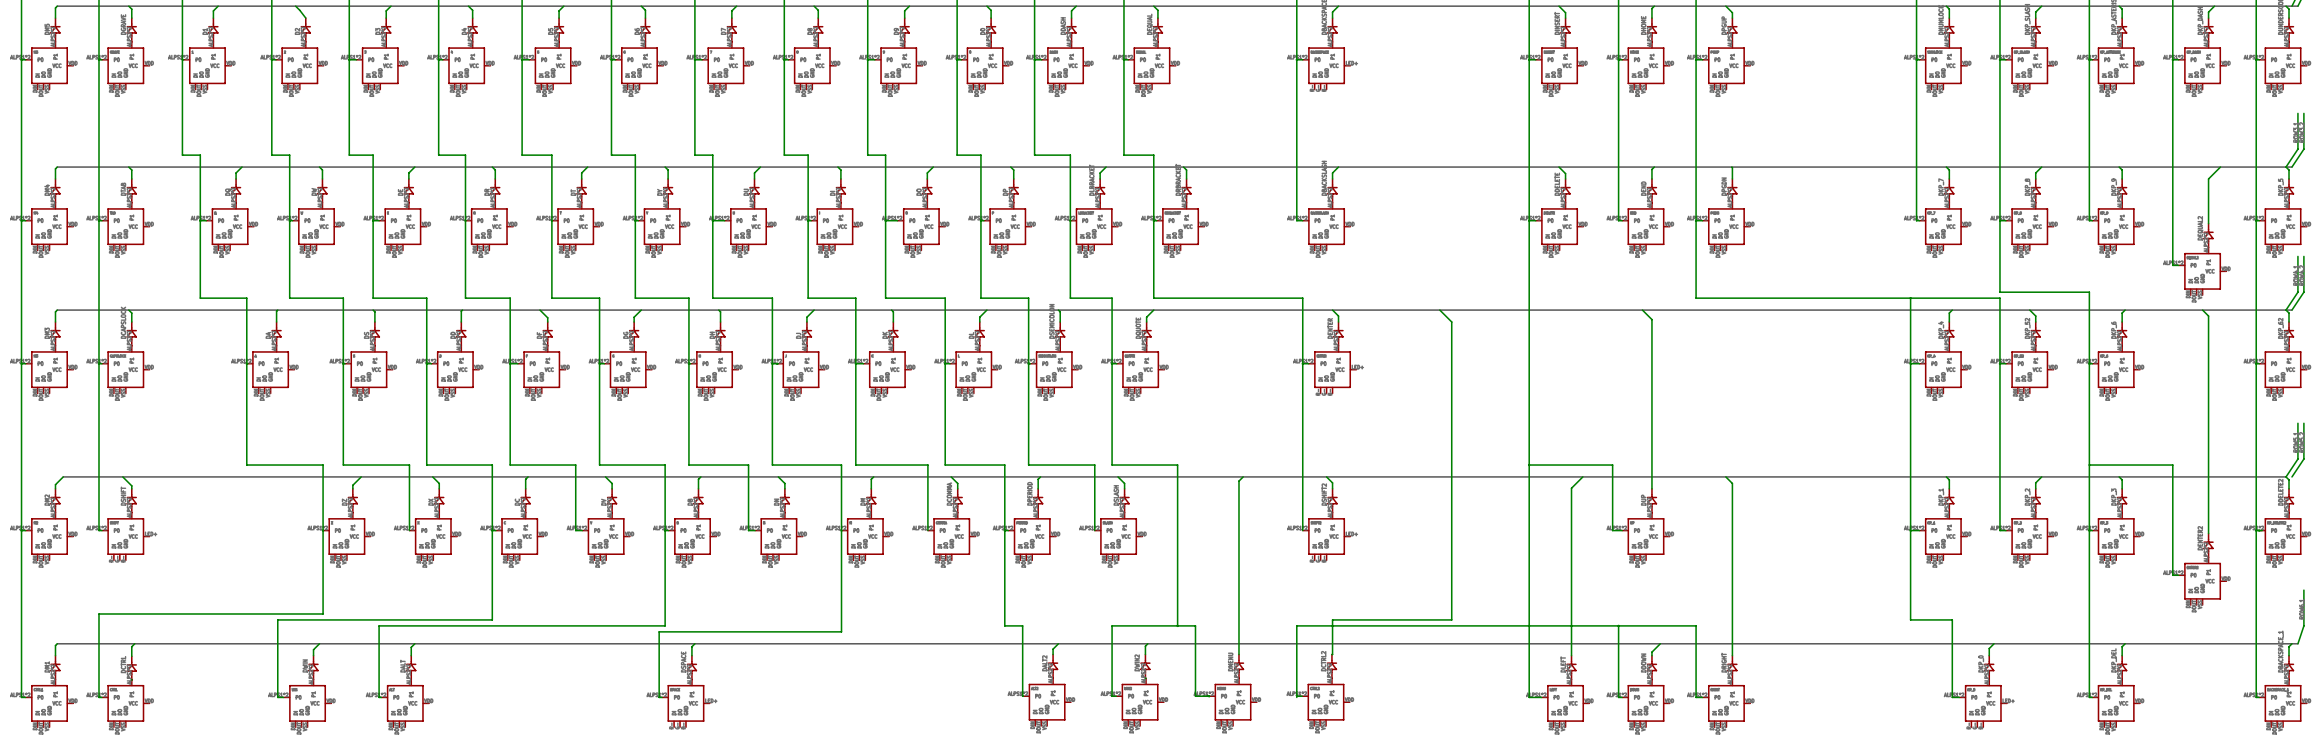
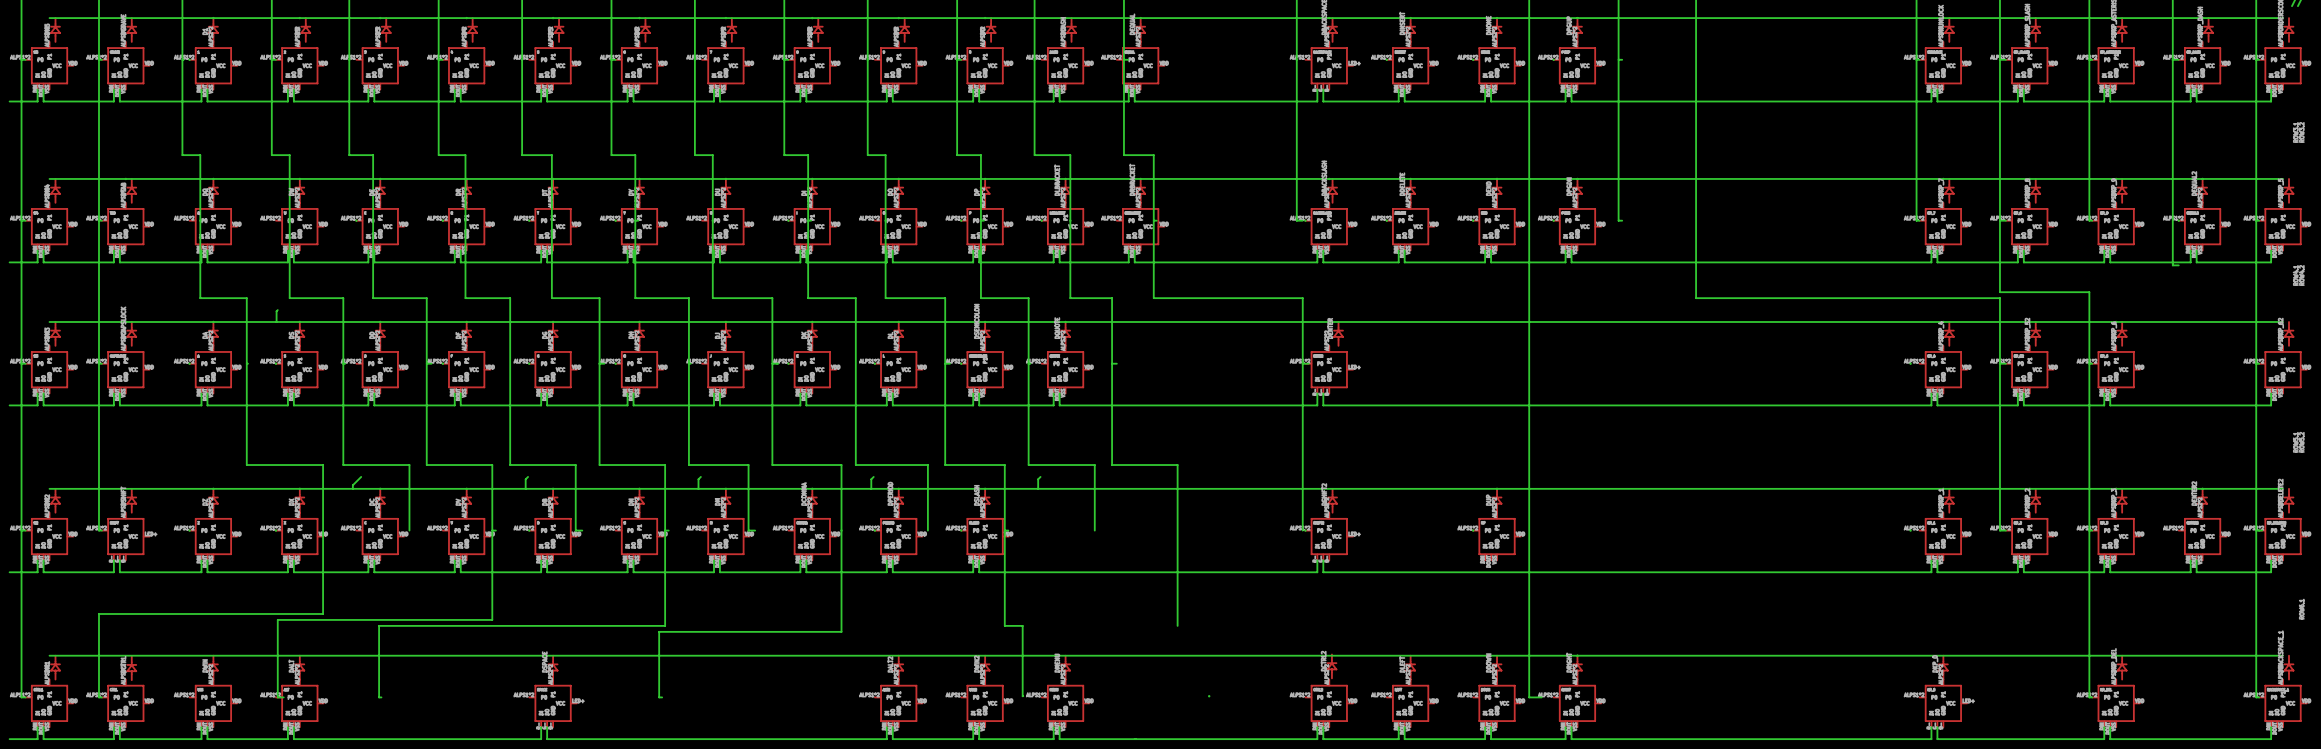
bus: (57, 6) (2297, 6) -> none
wire: (57, 6) (55, 7) (55, 18) -> none
wire: (128, 6) (131, 9) (131, 18) -> none
wire: (218, 6) (213, 10) (213, 18) -> none
wire: (295, 6) (305, 18) -> none
wire: (390, 6) (386, 10) (386, 18) -> none
wire: (468, 6) (472, 10) (472, 18) -> none
wire: (563, 6) (559, 10) (559, 18) -> none
wire: (641, 6) (645, 10) (645, 18) -> none
wire: (736, 6) (731, 10) (731, 18) -> none
wire: (814, 6) (818, 10) (818, 18) -> none
wire: (909, 6) (904, 10) (904, 18) -> none
wire: (986, 6) (991, 10) (991, 18) -> none
wire: (1076, 6) (1071, 10) (1071, 18) -> none
wire: (1153, 6) (1157, 10) (1157, 18) -> none
wire: (1338, 6) (1332, 12) (1332, 18) -> none
wire: (1559, 6) (1565, 12) (1565, 18) -> none
wire: (1654, 6) (1651, 8) (1651, 18) -> none
wire: (1725, 6) (1732, 12) (1732, 18) -> none
wire: (1946, 6) (1949, 9) (1949, 18) -> none
wire: (2041, 6) (2035, 12) (2035, 18) -> none
wire: (2119, 6) (2122, 9) (2122, 18) -> none
wire: (2214, 6) (2208, 12) (2208, 18) -> none
wire: (2286, 6) (2289, 9) (2289, 18) -> none
wire: none -> (49, 18) (2283, 18)
part position: (1157, 29) -> (1140, 29)
part: none -> (1410, 29)
part: none -> (1497, 29)
part: (1565, 29) -> none
part: none -> (1577, 29)
part: (1651, 29) -> none
part: (1732, 29) -> none
part symbol: [25, 41, 74, 90] -> [25, 41, 74, 90]
part symbol: [101, 41, 150, 90] -> [101, 41, 150, 90]
part symbol: [183, 41, 232, 90] -> [189, 41, 238, 90]
part symbol: [275, 41, 324, 90] -> [275, 41, 324, 90]
part symbol: [356, 41, 405, 90] -> [356, 41, 405, 90]
part symbol: [442, 41, 491, 90] -> [442, 41, 491, 90]
part symbol: [529, 41, 577, 90] -> [529, 41, 577, 90]
part symbol: [615, 41, 664, 90] -> [615, 41, 664, 90]
part symbol: [702, 41, 750, 90] -> [702, 41, 750, 90]
part symbol: [788, 41, 837, 90] -> [788, 41, 837, 90]
part symbol: [874, 41, 923, 90] -> [874, 41, 923, 90]
part symbol: [961, 41, 1009, 90] -> [961, 41, 1009, 90]
part symbol: [1041, 41, 1090, 90] -> [1041, 41, 1090, 90]
part symbol: [1919, 41, 1968, 90] -> [1919, 41, 1968, 90]
part symbol: [2005, 41, 2054, 90] -> [2005, 41, 2054, 90]
part symbol: [2092, 41, 2141, 90] -> [2092, 41, 2141, 90]
part symbol: [2178, 41, 2227, 90] -> [2178, 41, 2227, 90]
part symbol: [2259, 41, 2307, 90] -> [2259, 41, 2307, 90]
junction: none -> (189, 59)
wire: (349, 59) (356, 59) -> none
wire: (522, 59) (529, 59) -> none
wire: (694, 59) (702, 59) -> none
wire: (867, 59) (874, 59) -> none
wire: (1034, 59) (1041, 59) -> none
wire: (1296, 59) (1302, 59) -> none
junction: none -> (1386, 59)
junction: none -> (1473, 59)
wire: (1529, 59) (1535, 59) -> none
junction: none -> (1553, 59)
wire: (1696, 59) (1702, 59) -> none
part: none -> (1140, 65)
part: (1151, 65) -> none
part: (1326, 65) -> none
part: none -> (1329, 65)
part: none -> (1410, 65)
part: none -> (1497, 65)
part: (1559, 65) -> none
part: none -> (1577, 65)
part: (1646, 65) -> none
part: (1726, 65) -> none
wire: none -> (37, 89) (37, 101) (9, 101)
wire: none -> (43, 89) (43, 101) (113, 101) (113, 89)
wire: none -> (119, 89) (119, 101) (201, 101) (201, 89)
wire: none -> (207, 89) (207, 101) (287, 101) (287, 89)
wire: none -> (293, 89) (293, 101) (368, 101) (368, 89)
wire: none -> (374, 89) (374, 101) (454, 101) (454, 89)
wire: none -> (460, 89) (460, 101) (541, 101) (541, 89)
wire: none -> (547, 89) (547, 101) (627, 101) (627, 89)
wire: none -> (633, 89) (633, 101) (713, 101) (713, 89)
wire: none -> (719, 89) (719, 101) (800, 101) (800, 89)
wire: none -> (806, 89) (806, 101) (886, 101) (886, 89)
wire: none -> (892, 89) (892, 101) (973, 101) (973, 89)
wire: none -> (979, 89) (979, 101) (1053, 101) (1053, 89)
wire: none -> (1059, 89) (1059, 101) (1128, 101) (1128, 89)
wire: none -> (1134, 89) (1134, 101) (1317, 101) (1317, 89)
wire: none -> (1323, 89) (1323, 101) (1398, 101) (1398, 89)
wire: none -> (1404, 89) (1404, 101) (1485, 101) (1485, 89)
wire: none -> (1491, 89) (1491, 101) (1565, 101) (1565, 89)
wire: none -> (1571, 89) (1571, 101) (1931, 101) (1931, 89)
wire: none -> (1937, 89) (1937, 101) (2017, 101) (2017, 89)
wire: none -> (2023, 89) (2023, 101) (2104, 101) (2104, 89)
wire: none -> (2110, 89) (2110, 101) (2190, 101) (2190, 89)
wire: none -> (2196, 89) (2196, 101) (2271, 101) (2271, 89)
wire: (2297, 113) (2297, 149) (2286, 167) (2289, 170) (2289, 178) -> none
wire: (2303, 113) (2303, 149) (2291, 167) -> none
bus: (57, 167) (2291, 167) -> none
wire: (57, 167) (55, 168) (55, 178) -> none
wire: (128, 167) (131, 170) (131, 178) -> none
wire: (242, 167) (236, 173) (236, 178) -> none
wire: (319, 167) (322, 170) (322, 178) -> none
wire: (414, 167) (408, 173) (408, 178) -> none
wire: (492, 167) (495, 170) (495, 178) -> none
wire: (587, 167) (581, 173) (581, 178) -> none
wire: (665, 167) (668, 170) (668, 178) -> none
wire: (760, 167) (754, 173) (754, 178) -> none
wire: (837, 167) (840, 170) (840, 178) -> none
wire: (933, 167) (927, 173) (927, 178) -> none
wire: (1010, 167) (1013, 170) (1013, 178) -> none
wire: (1106, 167) (1100, 173) (1100, 178) -> none
wire: (1183, 167) (1186, 170) (1186, 178) -> none
wire: (1338, 167) (1332, 173) (1332, 178) -> none
wire: (1559, 167) (1565, 173) (1565, 178) -> none
wire: (1654, 167) (1651, 169) (1651, 178) -> none
wire: (1731, 167) (1732, 178) -> none
wire: (1946, 167) (1949, 170) (1949, 178) -> none
wire: (2041, 167) (2035, 173) (2035, 178) -> none
wire: (2119, 167) (2122, 170) (2122, 178) -> none
wire: (2220, 167) (2208, 178) (2208, 223) -> none
wire: none -> (49, 178) (2283, 178)
part position: (236, 190) -> (213, 190)
part position: (322, 190) -> (299, 190)
part position: (408, 190) -> (380, 190)
part position: (495, 190) -> (466, 190)
part position: (581, 190) -> (553, 190)
part position: (668, 190) -> (639, 190)
part position: (754, 190) -> (725, 190)
part position: (840, 190) -> (812, 190)
part position: (927, 190) -> (898, 190)
part position: (1013, 190) -> (985, 190)
part position: (1100, 190) -> (1065, 190)
part position: (1186, 190) -> (1140, 190)
part: none -> (1410, 190)
part: none -> (1497, 190)
part: (1565, 190) -> none
part: none -> (1577, 190)
part: (1651, 190) -> none
part: (1732, 190) -> none
part symbol: [25, 202, 74, 251] -> [25, 202, 74, 251]
part symbol: [101, 202, 150, 251] -> [101, 202, 150, 251]
part symbol: [1919, 202, 1968, 251] -> [1919, 202, 1968, 251]
part symbol: [2005, 202, 2054, 251] -> [2005, 202, 2054, 251]
part symbol: [2092, 202, 2141, 251] -> [2092, 202, 2141, 251]
part symbol: [2259, 202, 2307, 251] -> [2259, 202, 2307, 251]
junction: none -> (356, 220)
wire: (373, 220) (379, 220) -> none
junction: none -> (442, 220)
junction: none -> (529, 220)
junction: none -> (615, 220)
junction: none -> (788, 220)
junction: none -> (961, 220)
junction: none -> (1041, 220)
junction: none -> (1305, 220)
junction: none -> (1386, 220)
junction: none -> (1473, 220)
wire: (1529, 220) (1535, 220) -> none
junction: none -> (1553, 220)
wire: (1696, 220) (1702, 220) -> none
junction: none -> (2178, 220)
part: none -> (213, 226)
part: (230, 226) -> none
part: none -> (299, 226)
part: (316, 226) -> none
part: none -> (380, 226)
part: (402, 226) -> none
part: none -> (466, 226)
part: (489, 226) -> none
part: none -> (553, 226)
part: (575, 226) -> none
part: none -> (639, 226)
part: (662, 226) -> none
part: none -> (725, 226)
part: (748, 226) -> none
part: none -> (812, 226)
part: (834, 226) -> none
part: none -> (898, 226)
part: (921, 226) -> none
part: none -> (985, 226)
part: (1007, 226) -> none
part: none -> (1065, 226)
part: (1094, 226) -> none
part: none -> (1140, 226)
part: (1180, 226) -> none
part: (1326, 226) -> none
part: none -> (1329, 226)
part: none -> (1410, 226)
part: none -> (1497, 226)
part: (1559, 226) -> none
part: none -> (1577, 226)
part: (1646, 226) -> none
part: (1726, 226) -> none
part position: (2208, 235) -> (2202, 190)
part symbol: [2178, 247, 2227, 296] -> [2178, 202, 2227, 251]
wire: none -> (37, 250) (37, 262) (9, 262)
wire: none -> (43, 250) (43, 262) (113, 262) (113, 250)
wire: none -> (119, 250) (119, 262) (201, 262) (201, 250)
wire: none -> (207, 250) (207, 262) (287, 262) (287, 250)
wire: none -> (293, 250) (293, 262) (368, 262) (368, 250)
wire: none -> (374, 250) (374, 262) (454, 262) (454, 250)
wire: none -> (460, 250) (460, 262) (541, 262) (541, 250)
wire: none -> (547, 250) (547, 262) (627, 262) (627, 250)
wire: none -> (633, 250) (633, 262) (713, 262) (713, 250)
wire: none -> (719, 250) (719, 262) (800, 262) (800, 250)
wire: none -> (806, 250) (806, 262) (886, 262) (886, 250)
wire: none -> (892, 250) (892, 262) (973, 262) (973, 250)
wire: none -> (979, 250) (979, 262) (1053, 262) (1053, 250)
wire: none -> (1059, 250) (1059, 262) (1128, 262) (1128, 250)
wire: none -> (1134, 250) (1134, 262) (1317, 262) (1317, 250)
wire: none -> (1323, 250) (1323, 262) (1398, 262) (1398, 250)
wire: none -> (1404, 250) (1404, 262) (1485, 262) (1485, 250)
wire: none -> (1491, 250) (1491, 262) (1565, 262) (1565, 250)
wire: none -> (1571, 250) (1571, 262) (1931, 262) (1931, 250)
wire: none -> (1937, 250) (1937, 262) (2017, 262) (2017, 250)
wire: none -> (2023, 250) (2023, 262) (2104, 262) (2104, 250)
wire: none -> (2110, 250) (2110, 262) (2190, 262) (2190, 250)
wire: none -> (2196, 250) (2196, 262) (2271, 262) (2271, 250)
wire: (2297, 256) (2297, 292) (2286, 310) (2289, 313) (2289, 321) -> none
wire: (2303, 256) (2303, 292) (2291, 310) -> none
wire: (1910, 298) (1910, 619) (1952, 619) (1952, 697) (1959, 697) -> none
bus: (57, 310) (2291, 310) -> none
wire: (57, 310) (55, 311) (55, 321) -> none
wire: (128, 310) (131, 313) (131, 321) -> none
wire: (373, 310) (374, 311) (374, 321) -> none
wire: (462, 310) (461, 321) -> none
wire: (539, 310) (547, 317) (547, 321) -> none
wire: (641, 310) (634, 317) (634, 321) -> none
wire: (718, 310) (720, 311) (720, 321) -> none
wire: (814, 310) (806, 317) (806, 321) -> none
wire: (891, 310) (893, 311) (893, 321) -> none
wire: (986, 310) (979, 317) (979, 321) -> none
wire: (1058, 310) (1060, 311) (1060, 321) -> none
wire: (1153, 310) (1146, 317) (1146, 321) -> none
wire: (1332, 310) (1338, 316) (1338, 321) -> none
wire: (1439, 310) (1451, 321) (1451, 619) (1332, 619) (1331, 654) -> none
wire: (1642, 310) (1651, 319) (1651, 488) -> none
wire: (1952, 310) (1949, 313) (1949, 321) -> none
wire: (2029, 310) (2035, 316) (2035, 321) -> none
wire: (2125, 310) (2122, 313) (2122, 321) -> none
wire: (2202, 310) (2208, 316) (2208, 533) -> none
wire: none -> (49, 321) (2283, 321)
part: none -> (213, 333)
part: (276, 333) -> none
part: none -> (299, 333)
part: (374, 333) -> none
part: none -> (380, 333)
part: (461, 333) -> none
part: none -> (466, 333)
part: (547, 333) -> none
part: none -> (553, 333)
part: (634, 333) -> none
part: none -> (639, 333)
part: (720, 333) -> none
part: none -> (725, 333)
part: (806, 333) -> none
part: none -> (812, 333)
part: (893, 333) -> none
part: none -> (898, 333)
part: (979, 333) -> none
part: none -> (985, 333)
part: (1060, 333) -> none
part: none -> (1065, 333)
part: (1146, 333) -> none
part symbol: [25, 345, 74, 394] -> [25, 345, 74, 394]
part symbol: [101, 345, 150, 394] -> [101, 345, 150, 394]
part symbol: [1919, 345, 1968, 394] -> [1919, 345, 1968, 394]
part symbol: [2005, 345, 2054, 394] -> [2005, 345, 2054, 394]
part symbol: [2092, 345, 2141, 394] -> [2092, 345, 2141, 394]
part symbol: [2259, 345, 2307, 394] -> [2259, 345, 2307, 394]
junction: none -> (189, 363)
junction: none -> (275, 363)
junction: none -> (442, 363)
wire: (510, 363) (517, 363) -> none
junction: none -> (529, 363)
junction: none -> (615, 363)
junction: none -> (788, 363)
wire: (855, 363) (863, 363) -> none
junction: none -> (874, 363)
junction: none -> (961, 363)
wire: (1910, 363) (1919, 363) -> none
part: none -> (213, 369)
part: (270, 369) -> none
part: none -> (299, 369)
part: (368, 369) -> none
part: none -> (380, 369)
part: (455, 369) -> none
part: none -> (466, 369)
part: (541, 369) -> none
part: none -> (553, 369)
part: (628, 369) -> none
part: none -> (639, 369)
part: (714, 369) -> none
part: none -> (725, 369)
part: (800, 369) -> none
part: none -> (812, 369)
part: (887, 369) -> none
part: none -> (898, 369)
part: (973, 369) -> none
part: none -> (985, 369)
part: (1054, 369) -> none
part: none -> (1065, 369)
part: (1140, 369) -> none
part: none -> (1329, 369)
part: (1332, 369) -> none
wire: none -> (37, 393) (37, 405) (9, 405)
wire: none -> (43, 393) (43, 405) (113, 405) (113, 393)
wire: none -> (119, 393) (119, 405) (201, 405) (201, 393)
wire: none -> (207, 393) (207, 405) (287, 405) (287, 393)
wire: none -> (293, 393) (293, 405) (368, 405) (368, 393)
wire: none -> (374, 393) (374, 405) (454, 405) (454, 393)
wire: none -> (460, 393) (460, 405) (541, 405) (541, 393)
wire: none -> (547, 393) (547, 405) (627, 405) (627, 393)
wire: none -> (633, 393) (633, 405) (713, 405) (713, 393)
wire: none -> (719, 393) (719, 405) (800, 405) (800, 393)
wire: none -> (806, 393) (806, 405) (886, 405) (886, 393)
wire: none -> (892, 393) (892, 405) (973, 405) (973, 393)
wire: none -> (979, 393) (979, 405) (1053, 405) (1053, 393)
wire: none -> (1059, 393) (1059, 405) (1317, 405) (1317, 393)
wire: none -> (1323, 393) (1323, 405) (1931, 405) (1931, 393)
wire: none -> (1937, 393) (1937, 405) (2017, 405) (2017, 393)
wire: none -> (2023, 393) (2023, 405) (2104, 405) (2104, 393)
wire: none -> (2110, 393) (2110, 405) (2271, 405) (2271, 393)
wire: (2297, 423) (2297, 459) (2286, 476) (2289, 479) (2289, 488) -> none
wire: (2303, 423) (2303, 459) (2291, 476) -> none
wire: (1529, 465) (1612, 465) (1612, 530) (1622, 530) -> none
wire: (2089, 465) (2172, 465) (2172, 575) (2178, 575) -> none
bus: (63, 476) (2286, 476) -> none
wire: (63, 476) (55, 484) (55, 488) -> none
wire: (122, 476) (131, 485) (131, 488) -> none
wire: (432, 476) (439, 483) (439, 488) -> none
wire: (605, 476) (612, 483) (612, 488) -> none
wire: (778, 476) (784, 483) (784, 488) -> none
wire: (951, 476) (957, 483) (957, 488) -> none
wire: (1118, 476) (1124, 483) (1124, 488) -> none
wire: (1243, 476) (1238, 481) (1238, 654) -> none
wire: (1326, 476) (1332, 482) (1332, 488) -> none
wire: (1582, 476) (1571, 488) (1571, 655) -> none
wire: (1725, 476) (1732, 483) (1732, 655) -> none
wire: (1946, 476) (1949, 479) (1949, 488) -> none
wire: (2041, 476) (2035, 482) (2035, 488) -> none
wire: (2119, 476) (2122, 479) (2122, 488) -> none
wire: none -> (49, 488) (2283, 488)
part: none -> (213, 500)
part: none -> (299, 500)
part: (352, 500) -> none
part: none -> (380, 500)
part: (439, 500) -> none
part: none -> (466, 500)
part: (525, 500) -> none
part: none -> (553, 500)
part: (612, 500) -> none
part: none -> (639, 500)
part: (698, 500) -> none
part: none -> (725, 500)
part: (784, 500) -> none
part: none -> (812, 500)
part: (871, 500) -> none
part: none -> (898, 500)
part: (957, 500) -> none
part: none -> (985, 500)
part: (1038, 500) -> none
part: (1124, 500) -> none
part: none -> (1497, 500)
part: (1651, 500) -> none
part symbol: [25, 512, 74, 561] -> [25, 512, 74, 561]
part symbol: [101, 512, 150, 561] -> [101, 512, 150, 561]
part symbol: [1302, 512, 1351, 561] -> [1305, 512, 1354, 561]
part symbol: [1919, 512, 1968, 561] -> [1919, 512, 1968, 561]
part symbol: [2005, 512, 2054, 561] -> [2005, 512, 2054, 561]
part symbol: [2092, 512, 2141, 561] -> [2092, 512, 2141, 561]
part symbol: [2259, 512, 2307, 561] -> [2259, 512, 2307, 561]
junction: none -> (189, 530)
junction: none -> (275, 530)
junction: none -> (529, 530)
junction: none -> (874, 530)
junction: none -> (961, 530)
junction: none -> (1305, 530)
junction: none -> (1473, 530)
wire: (1910, 530) (1919, 530) -> none
part: none -> (213, 536)
part: none -> (299, 536)
part: (346, 536) -> none
part: none -> (380, 536)
part: (433, 536) -> none
part: none -> (466, 536)
part: (519, 536) -> none
part: none -> (553, 536)
part: (606, 536) -> none
part: none -> (639, 536)
part: (692, 536) -> none
part: none -> (725, 536)
part: (778, 536) -> none
part: none -> (812, 536)
part: (865, 536) -> none
part: none -> (898, 536)
part: (951, 536) -> none
part: none -> (985, 536)
part: (1032, 536) -> none
part: (1118, 536) -> none
part: none -> (1497, 536)
part: (1646, 536) -> none
part position: (2208, 545) -> (2202, 500)
part symbol: [2178, 557, 2227, 606] -> [2178, 512, 2227, 561]
wire: none -> (37, 560) (37, 572) (9, 572)
wire: none -> (43, 560) (43, 572) (113, 572) (113, 560)
wire: none -> (119, 560) (119, 572) (201, 572) (201, 560)
wire: none -> (207, 560) (207, 572) (287, 572) (287, 560)
wire: none -> (293, 560) (293, 572) (368, 572) (368, 560)
wire: none -> (374, 560) (374, 572) (454, 572) (454, 560)
wire: none -> (460, 560) (460, 572) (541, 572) (541, 560)
wire: none -> (547, 560) (547, 572) (627, 572) (627, 560)
wire: none -> (633, 560) (633, 572) (713, 572) (713, 560)
wire: none -> (719, 560) (719, 572) (800, 572) (800, 560)
wire: none -> (806, 560) (806, 572) (886, 572) (886, 560)
wire: none -> (892, 560) (892, 572) (973, 572) (973, 560)
wire: none -> (979, 560) (979, 572) (1317, 572) (1317, 560)
wire: none -> (1323, 560) (1323, 572) (1931, 572) (1931, 560)
wire: none -> (1937, 560) (1937, 572) (2017, 572) (2017, 560)
wire: none -> (2023, 560) (2023, 572) (2104, 572) (2104, 560)
wire: none -> (2110, 560) (2110, 572) (2190, 572) (2190, 560)
wire: none -> (2196, 560) (2196, 572) (2271, 572) (2271, 560)
wire: (2303, 590) (2303, 625) (2297, 643) -> none
wire: (1618, 625) (1618, 697) (1622, 697) -> none
bus: (57, 643) (2297, 643) -> none
wire: (57, 643) (55, 645) (55, 655) -> none
wire: (134, 643) (131, 646) (131, 656) -> none
wire: (319, 643) (313, 649) (313, 655) -> none
wire: (414, 643) (411, 647) (411, 655) -> none
wire: (694, 643) (691, 646) (691, 655) -> none
wire: (1058, 643) (1053, 649) (1053, 654) -> none
wire: (1147, 643) (1145, 646) (1145, 654) -> none
wire: (1660, 643) (1651, 652) (1651, 655) -> none
wire: (1994, 643) (1989, 648) (1989, 655) -> none
wire: (2125, 643) (2122, 646) (2122, 655) -> none
wire: (2291, 643) (2289, 646) (2289, 655) -> none
wire: none -> (49, 655) (2283, 655)
part position: (1053, 666) -> (898, 667)
part position: (1145, 666) -> (985, 667)
part: (1238, 666) -> none
part: none -> (213, 667)
part: none -> (299, 667)
part: (313, 667) -> none
part: (411, 667) -> none
part: none -> (553, 667)
part: (691, 667) -> none
part: none -> (1065, 667)
part: none -> (1410, 667)
part: none -> (1497, 667)
part: (1571, 667) -> none
part: none -> (1577, 667)
part: (1651, 667) -> none
part: (1732, 667) -> none
part position: (1989, 667) -> (1943, 667)
part symbol: [1023, 678, 1071, 727] -> [874, 679, 923, 728]
part symbol: [1116, 678, 1164, 727] -> [961, 679, 1009, 728]
wire: (1145, 678) (1146, 678) -> none
part symbol: [1302, 678, 1350, 727] -> [1305, 679, 1354, 728]
part symbol: [25, 679, 74, 728] -> [25, 679, 74, 728]
part symbol: [101, 679, 150, 728] -> [101, 679, 150, 728]
part symbol: [1959, 679, 2008, 728] -> [1919, 679, 1968, 728]
part symbol: [2092, 679, 2141, 728] -> [2092, 679, 2141, 728]
part symbol: [2259, 679, 2307, 728] -> [2259, 679, 2307, 728]
wire: (1116, 696) (1112, 696) (1112, 625) (1195, 625) (1195, 696) (1209, 696) -> none
wire: (1296, 697) (1296, 625) (1696, 625) (1696, 697) (1702, 697) -> none
part: (1233, 702) -> none
part: none -> (213, 703)
part: none -> (299, 703)
part: (307, 703) -> none
part: (405, 703) -> none
part: none -> (553, 703)
part: (685, 703) -> none
part: none -> (1065, 703)
part: none -> (1410, 703)
part: none -> (1497, 703)
part: (1565, 703) -> none
part: none -> (1577, 703)
part: (1646, 703) -> none
part: (1726, 703) -> none
wire: none -> (37, 727) (37, 739) (9, 739)
wire: none -> (43, 727) (43, 739) (113, 739) (113, 727)
wire: none -> (119, 727) (119, 739) (201, 739) (201, 727)
wire: none -> (207, 727) (207, 739) (287, 739) (287, 727)
wire: none -> (293, 727) (293, 739) (541, 739) (541, 727)
wire: none -> (547, 727) (547, 739) (886, 739) (886, 727)
wire: none -> (892, 727) (892, 739) (973, 739) (973, 727)
wire: none -> (979, 727) (979, 739) (1053, 739) (1053, 727)
wire: none -> (1059, 727) (1059, 739) (1317, 739) (1317, 727)
wire: none -> (1323, 727) (1323, 739) (1398, 739) (1398, 727)
wire: none -> (1404, 727) (1404, 739) (1485, 739) (1485, 727)
wire: none -> (1491, 727) (1491, 739) (1565, 739) (1565, 727)
wire: none -> (1571, 727) (1571, 739) (1931, 739) (1931, 727)
wire: none -> (1937, 727) (1937, 739) (2104, 739) (2104, 727)
wire: none -> (2110, 727) (2110, 739) (2271, 739) (2271, 727)

